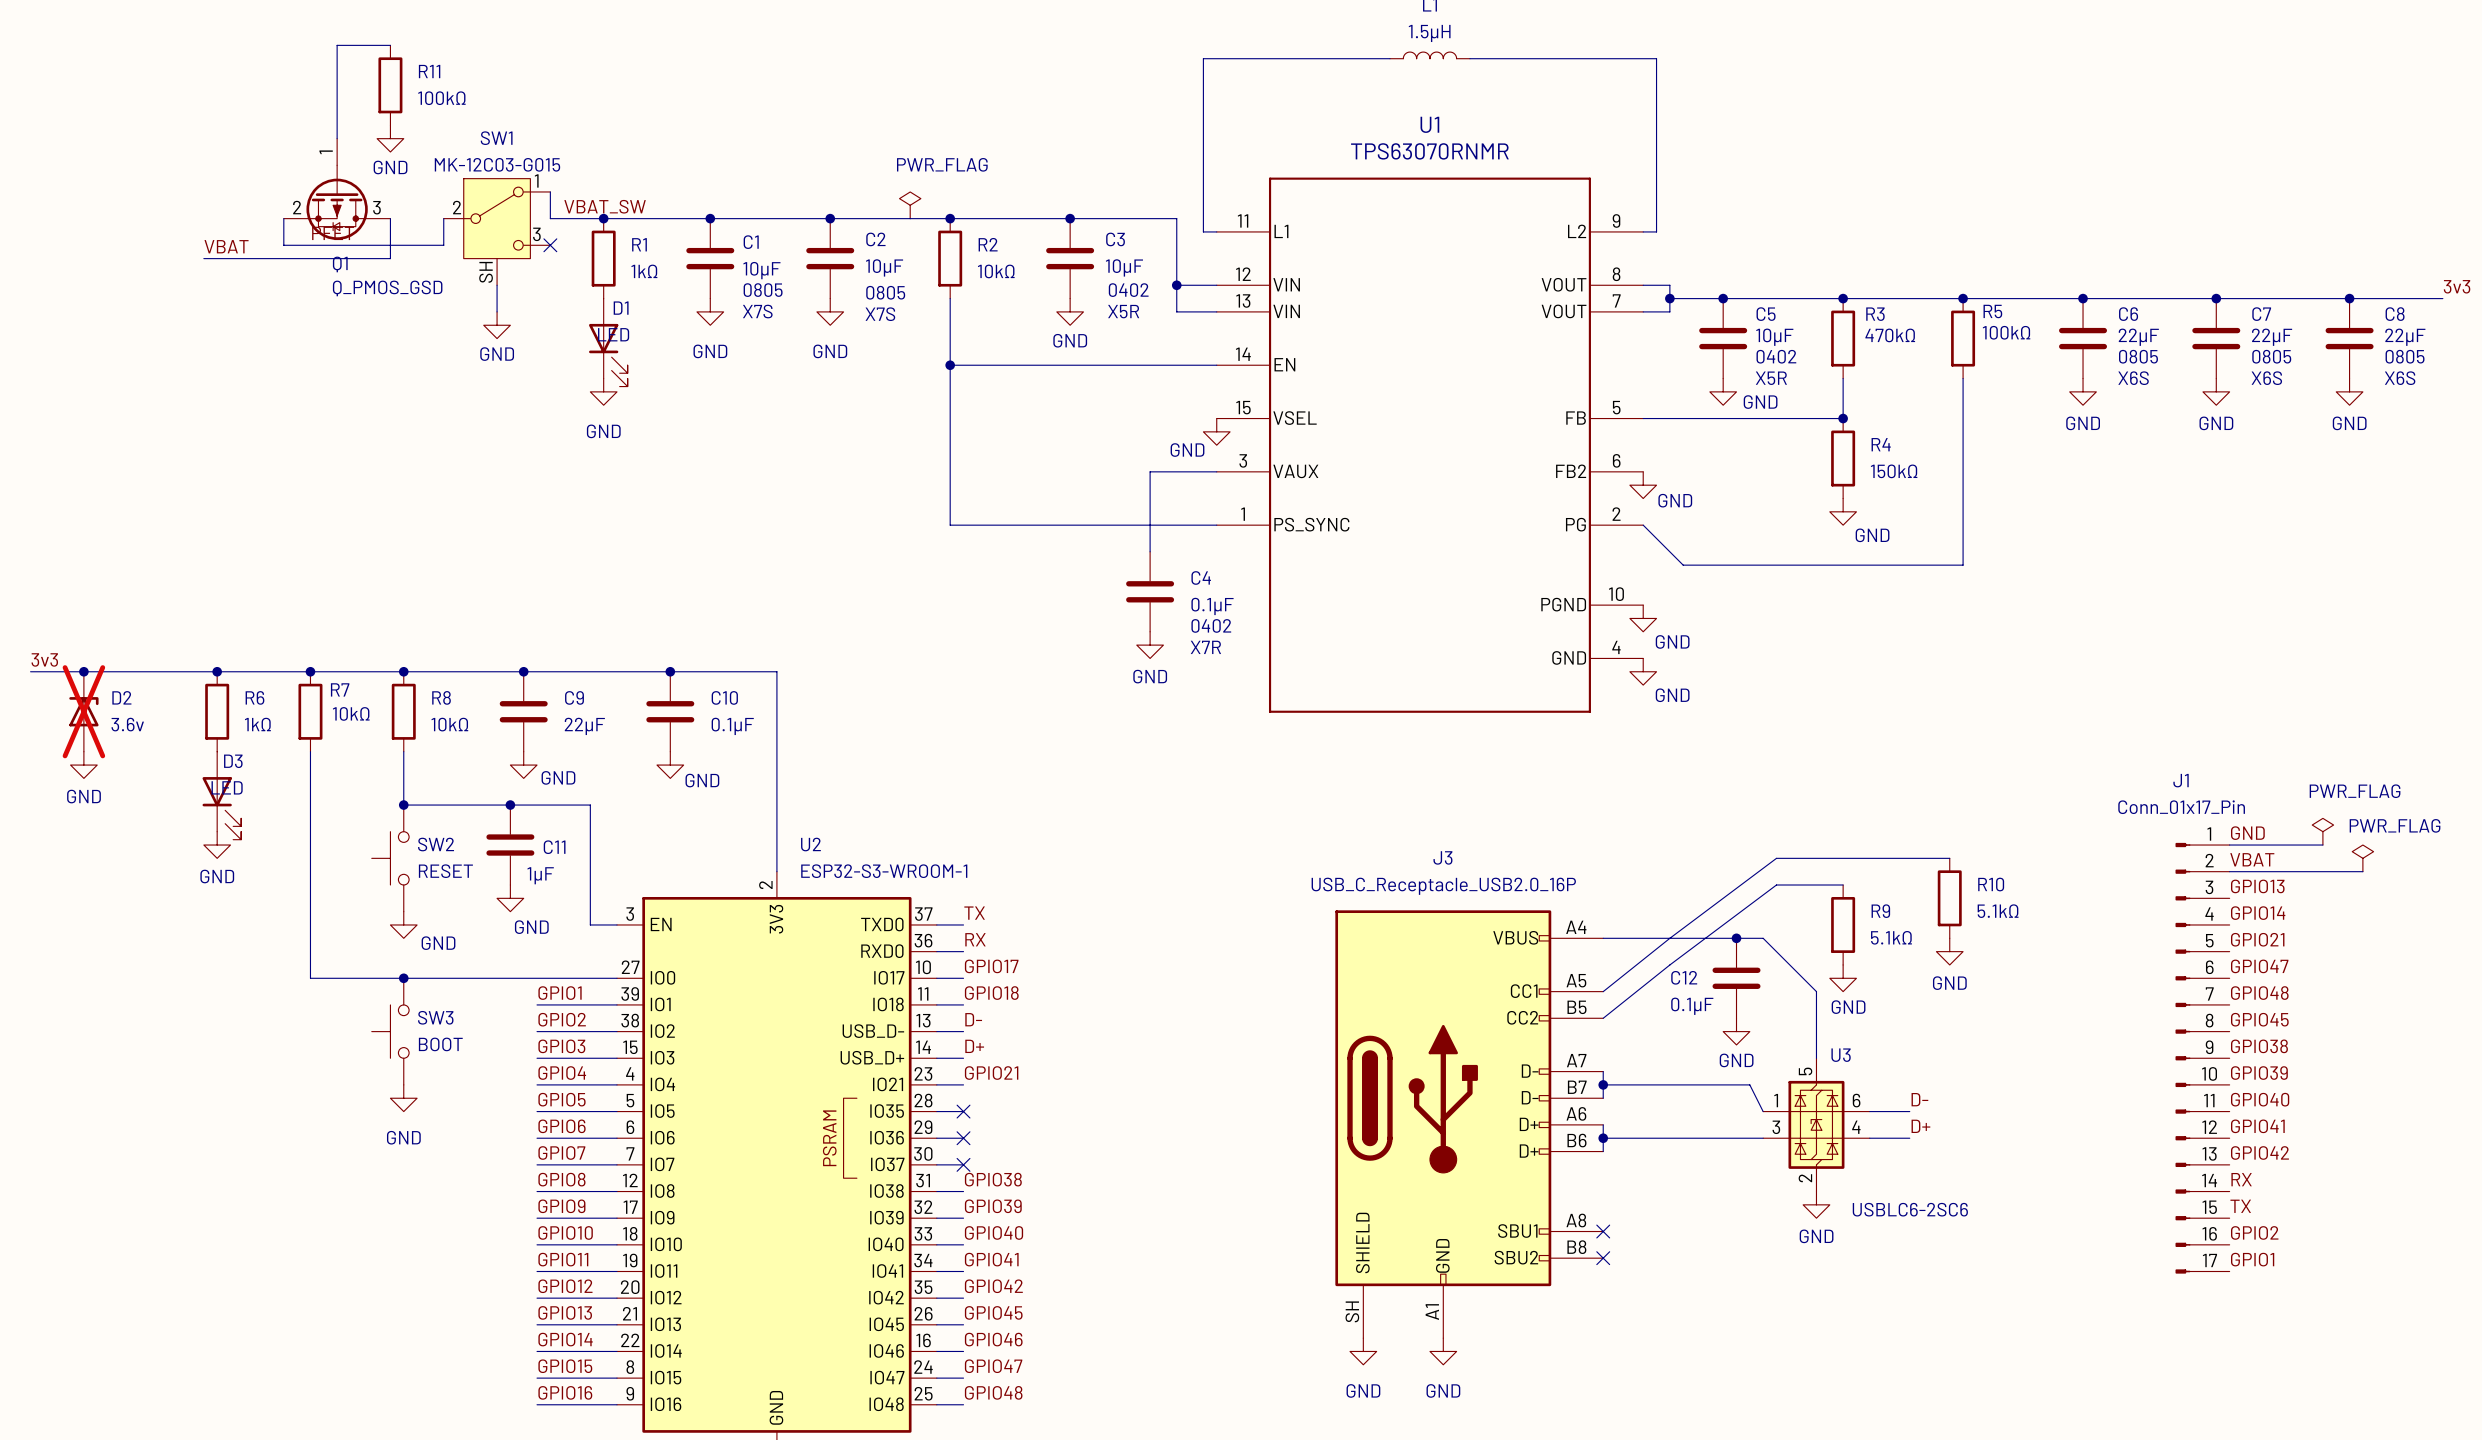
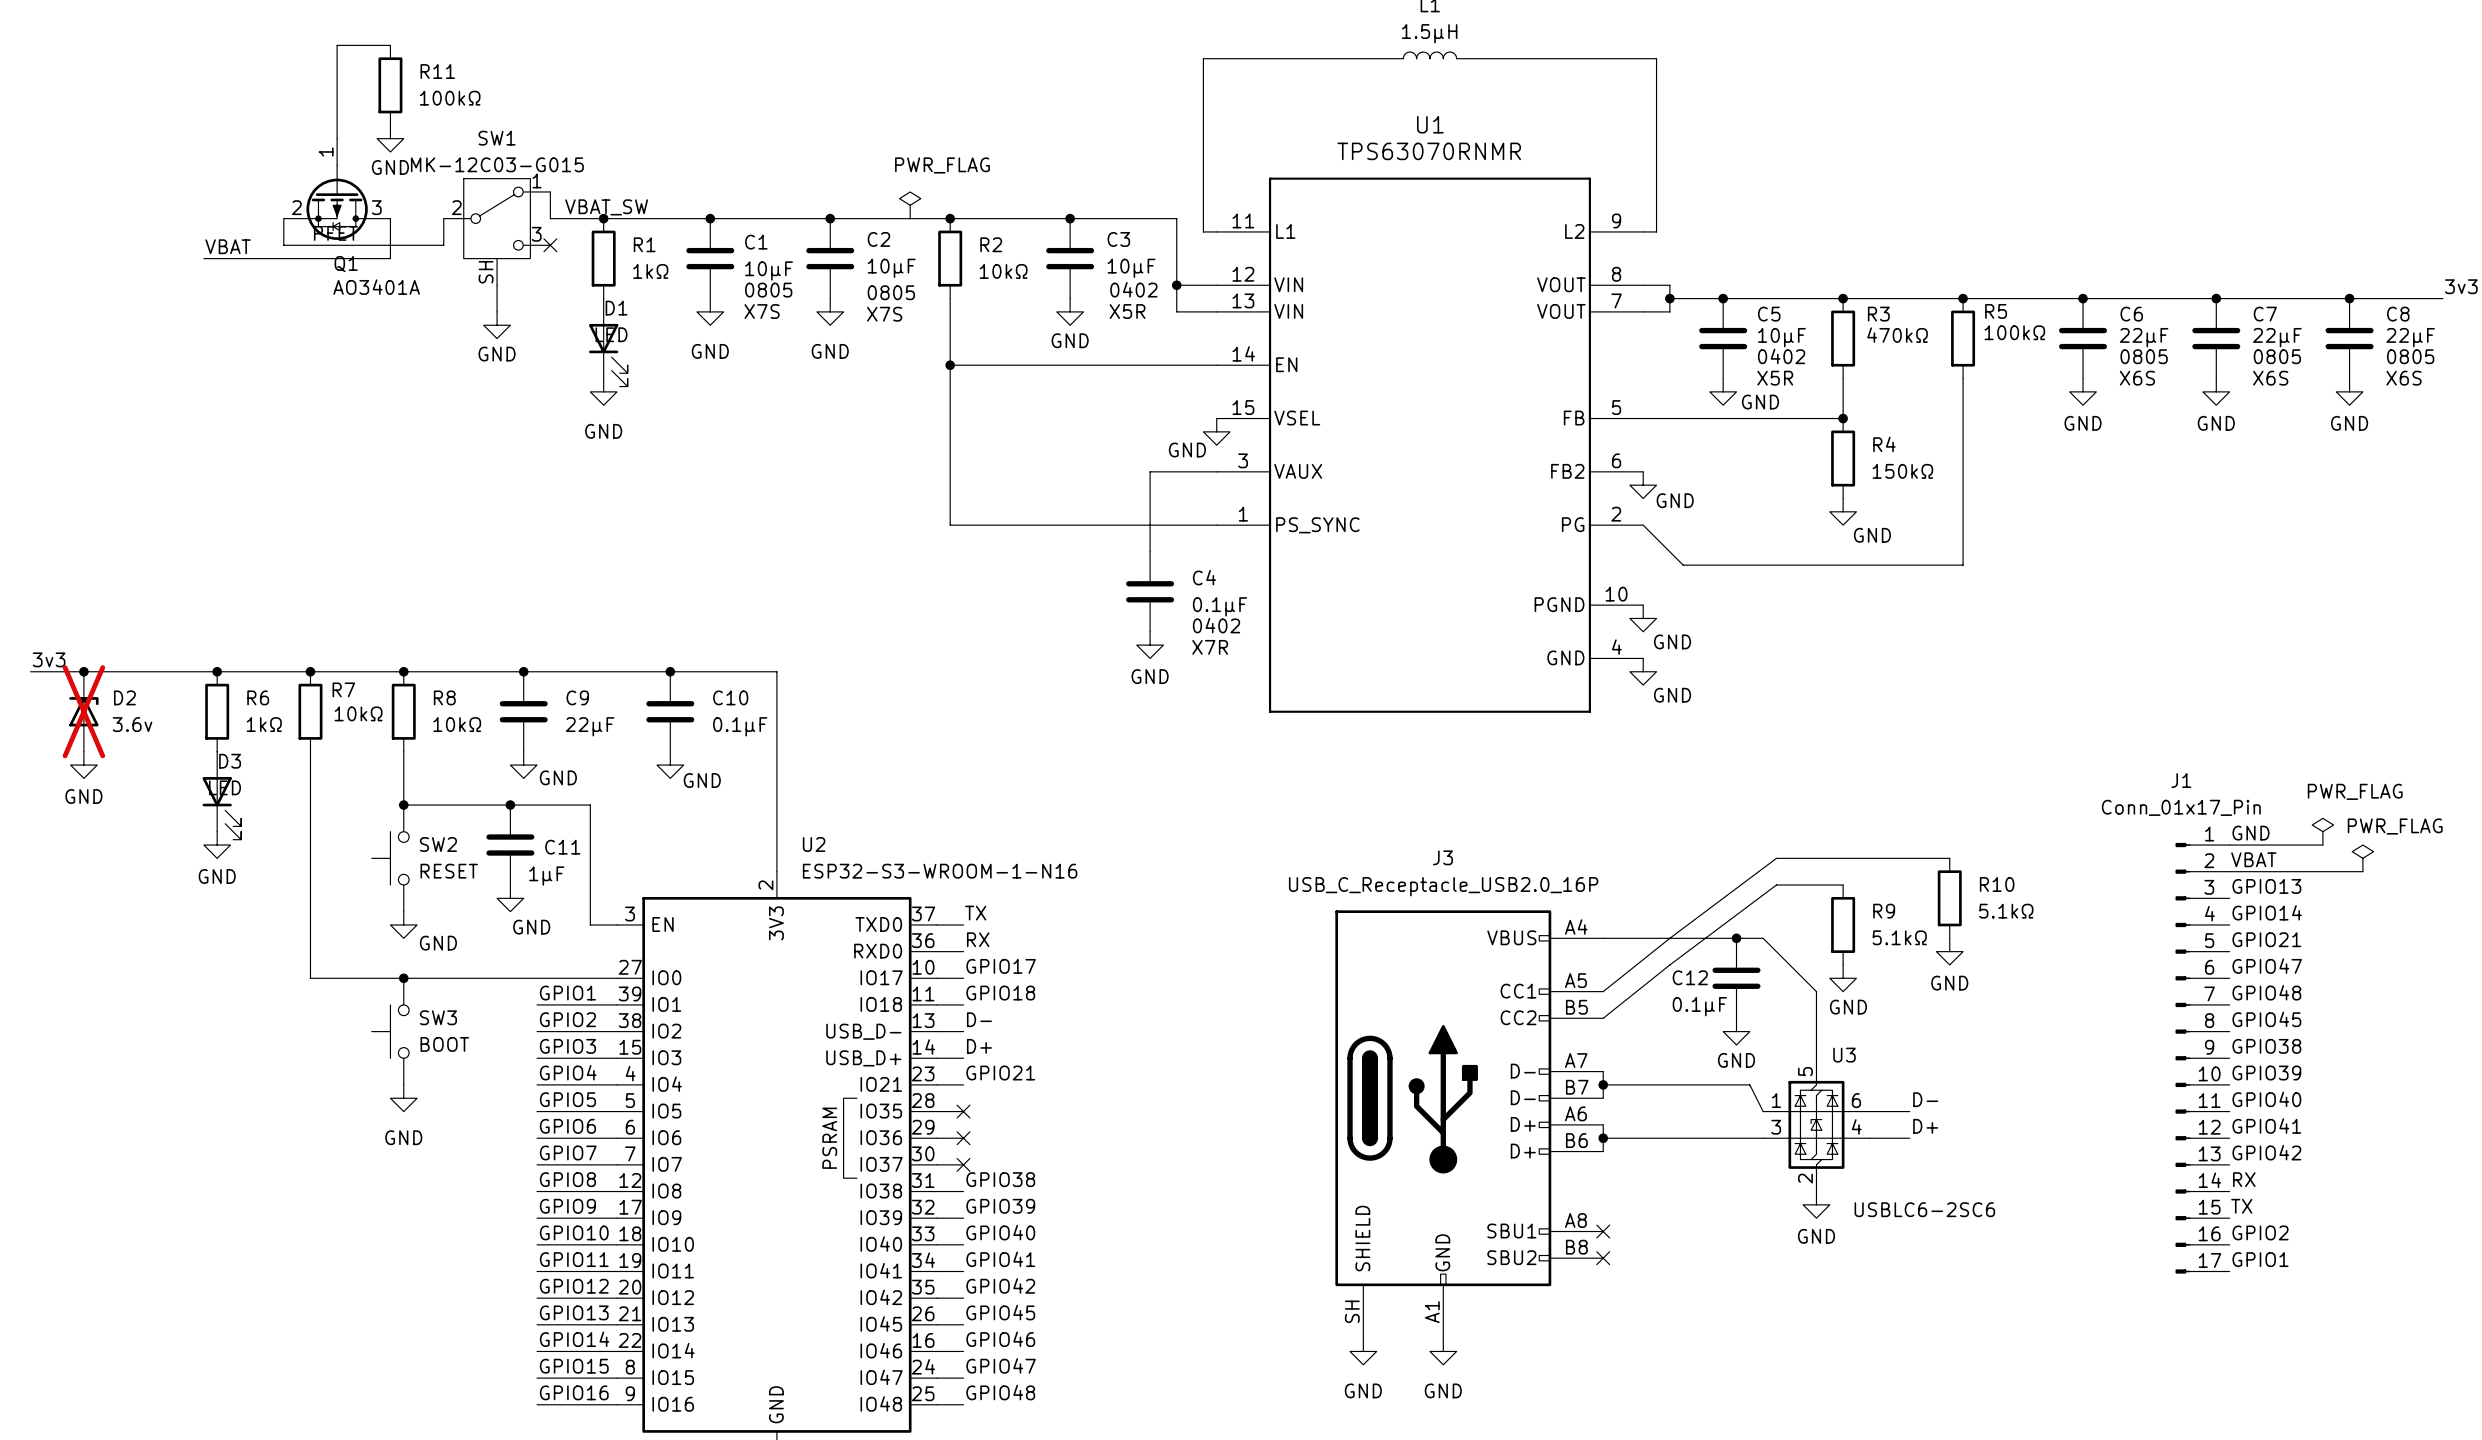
Q1 value: Q_PMOS_GSD (387, 288) -> AO3401A (376, 287)
U2 value: ESP32-S3-WROOM-1 (884, 871) -> ESP32-S3-WROOM-1-N16 (940, 871)

